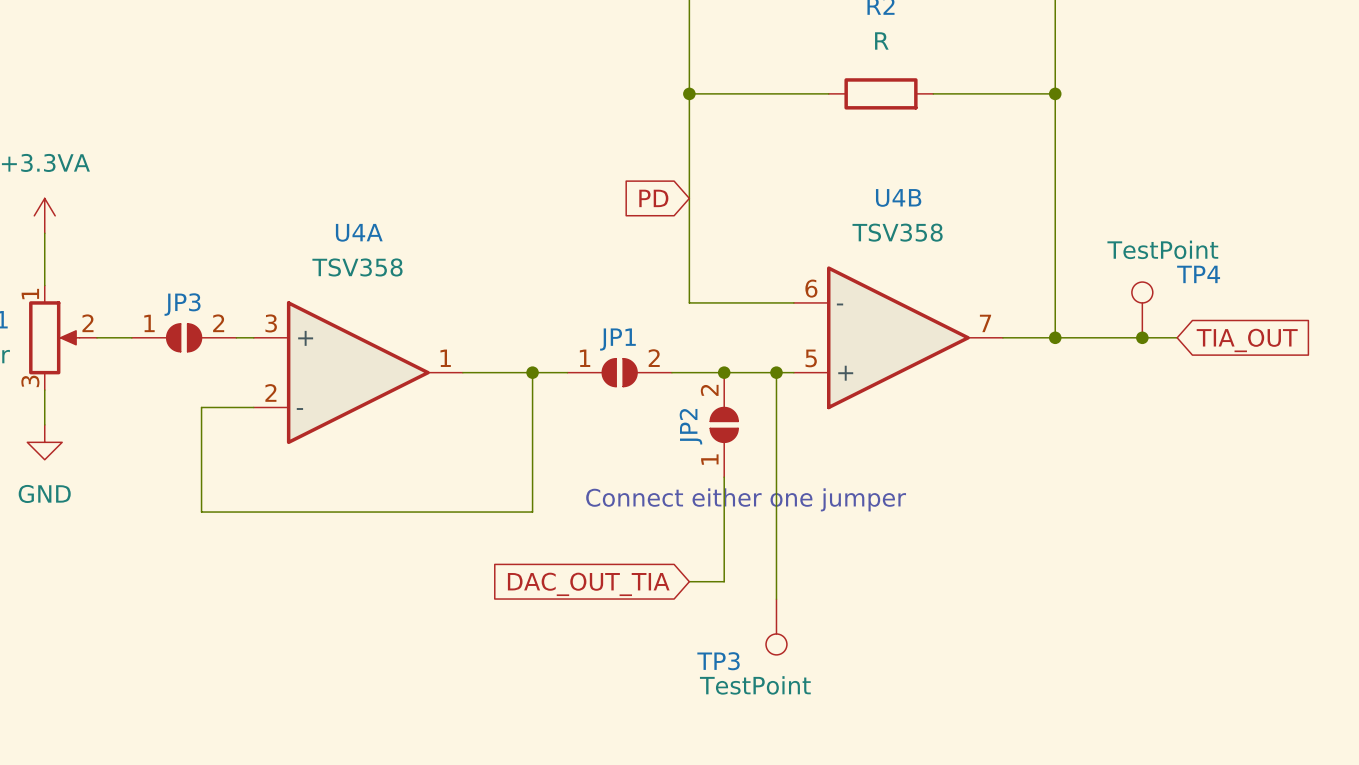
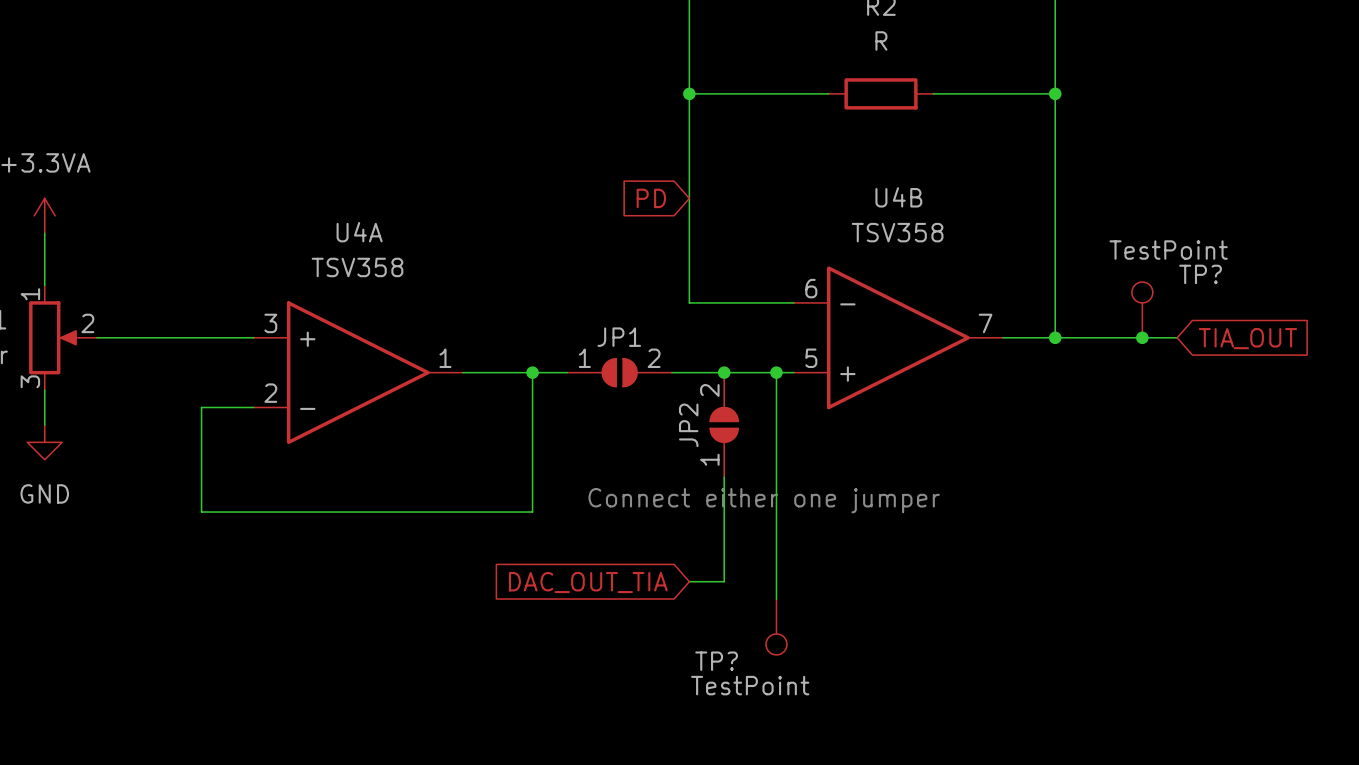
TP4 name: TP4 (1198, 274) -> TP? (1200, 274)
JP3: (184, 337) -> none
TP3 name: TP3 (718, 661) -> TP? (716, 661)

